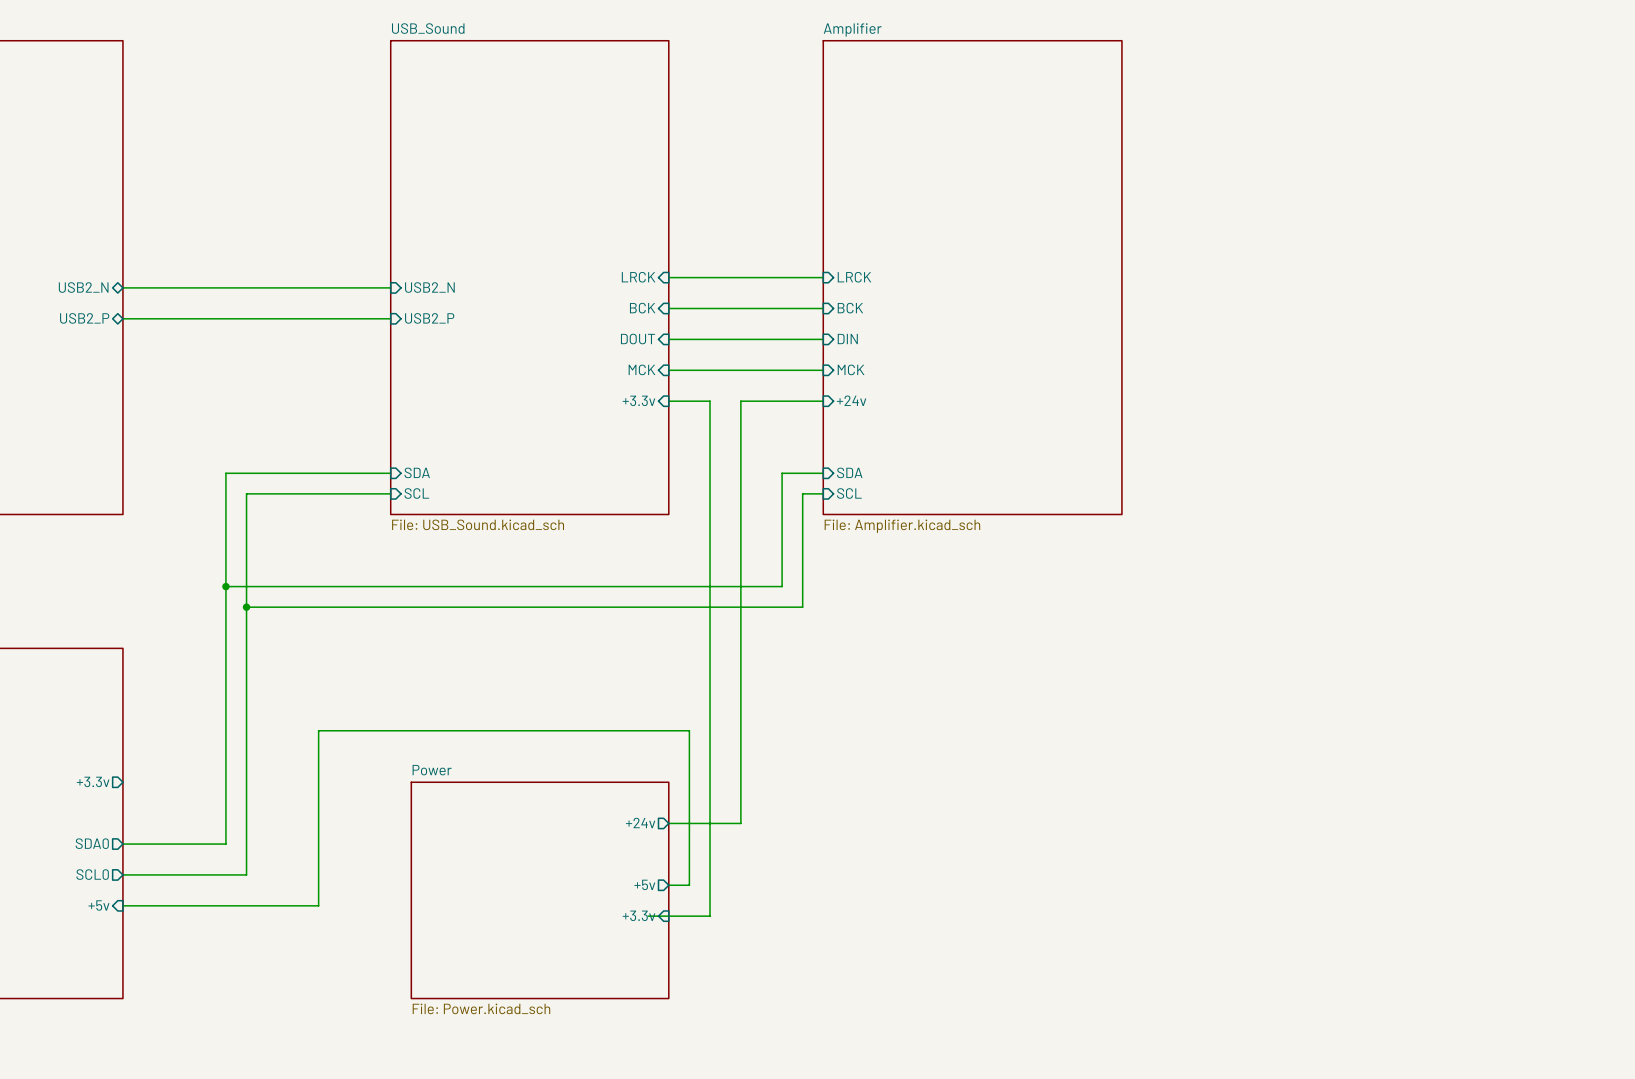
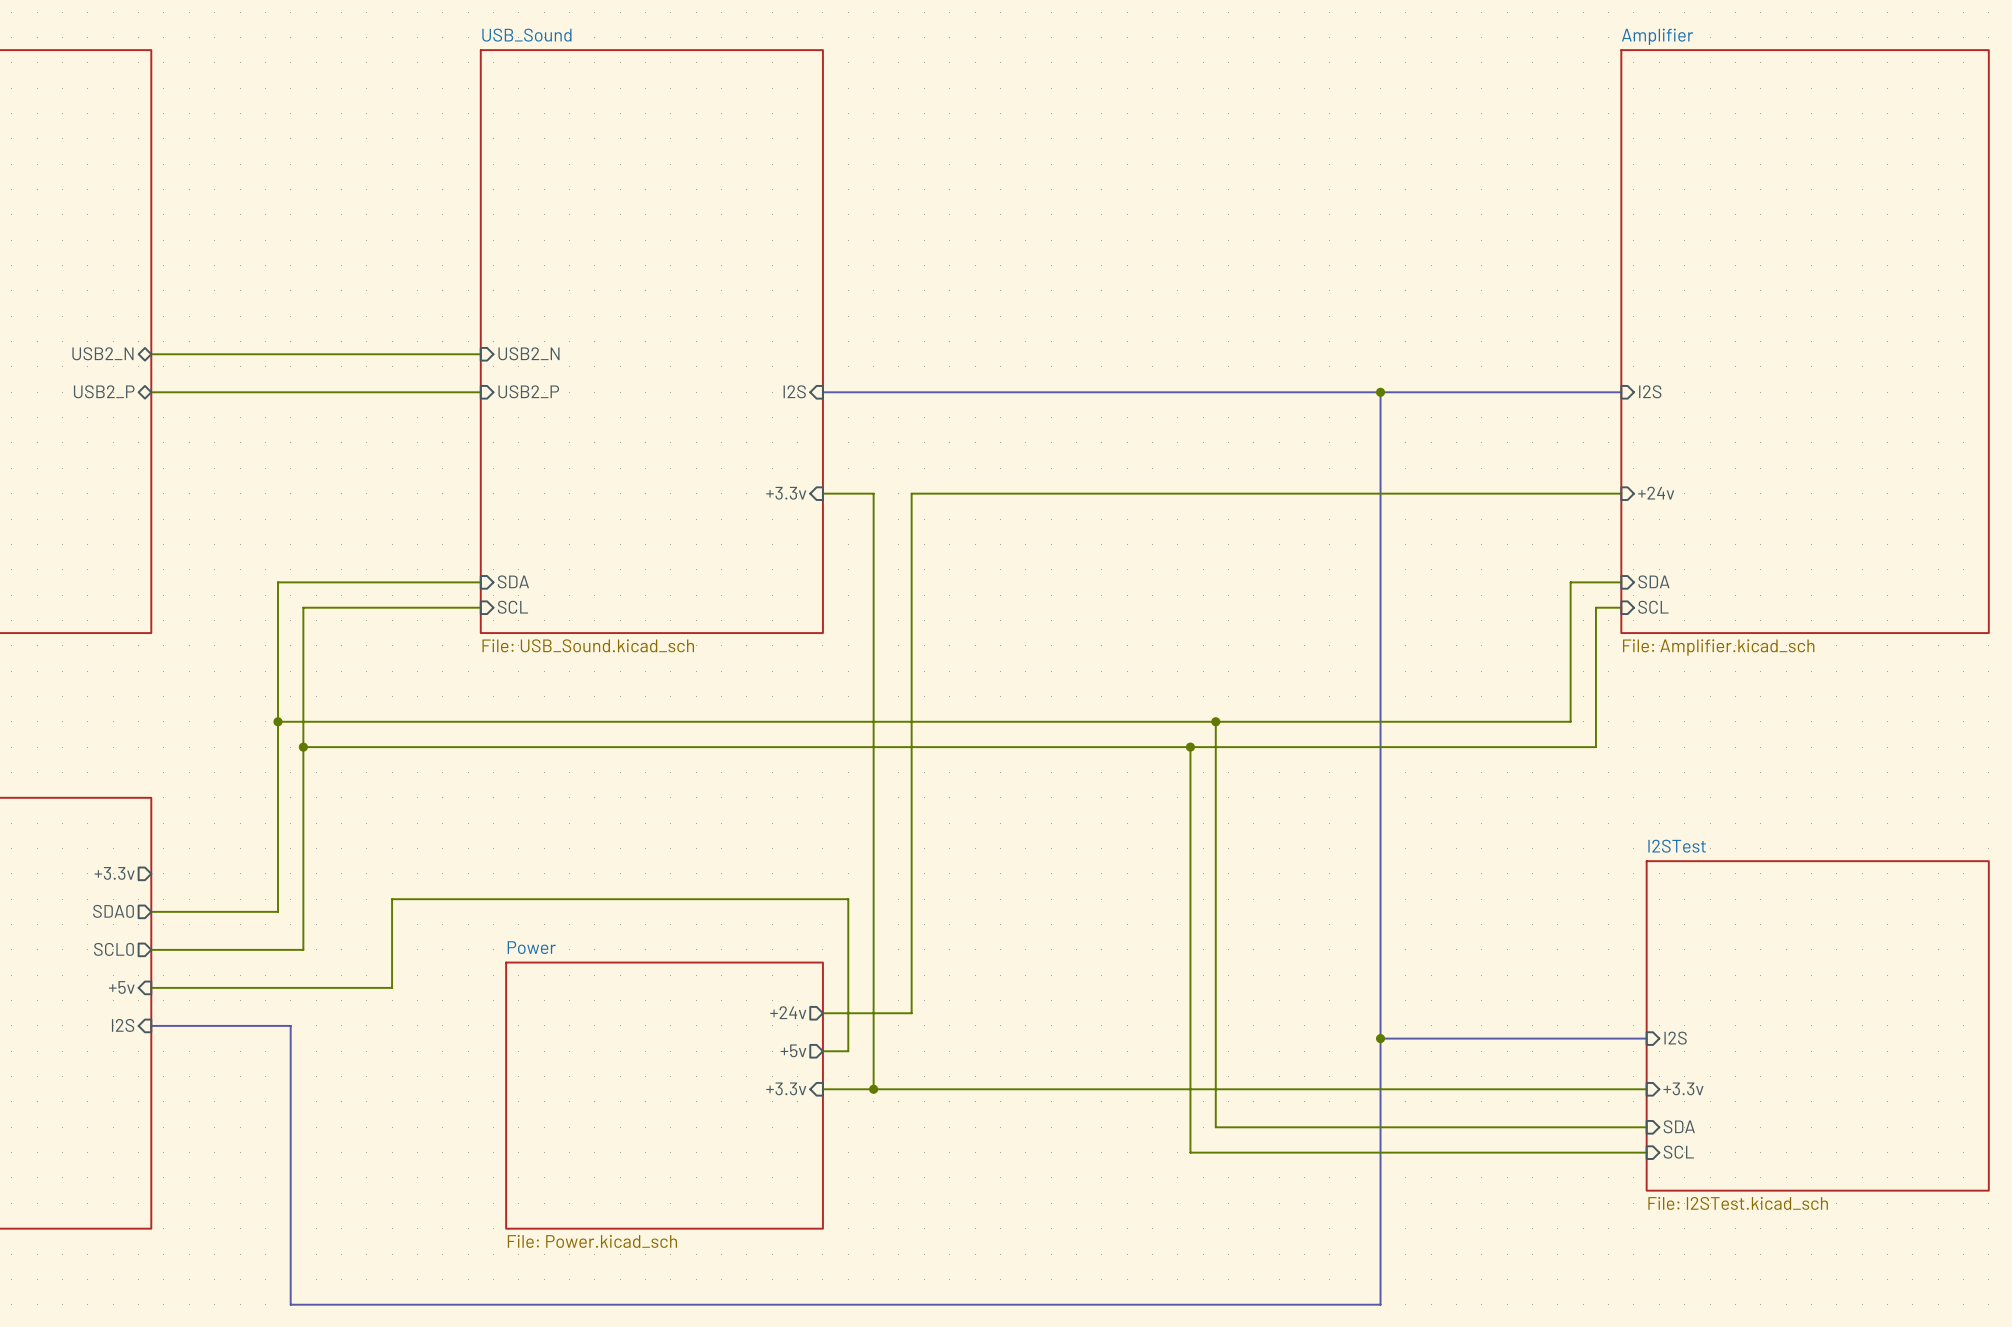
sheet pin: LRCK (638, 277) -> none
wire: (668, 277) (823, 277) -> none
sheet pin: LRCK (854, 277) -> none
sheet Amplifier: File: Amplifier.kicad_sch (972, 277) -> none
sheet Amplifier: none -> File: Amplifier.kicad_sch (1805, 341)
sheet pin: BCK (642, 308) -> none
wire: (668, 308) (823, 308) -> none
sheet pin: BCK (850, 308) -> none
sheet pin: none -> I2S (794, 391)
bus: none -> (822, 392) (1621, 392)
bus: none -> (1380, 392) (1380, 1304) (290, 1304) (290, 1025) (151, 1025)
junction: none -> (1380, 392)
sheet pin: none -> I2S (1650, 391)
sheet pin: DOUT (638, 339) -> none
wire: (668, 339) (823, 339) -> none
sheet pin: DIN (847, 339) -> none
sheet pin: MCK (641, 369) -> none
sheet pin: MCK (851, 369) -> none
wire: (668, 370) (823, 370) -> none
sheet pin: +24v (851, 400) -> none
sheet pin: none -> +24v (1656, 493)
wire: none -> (1013, 493) (1621, 493)
sheet pin: SDA (849, 472) -> none
sheet pin: none -> SDA (1653, 581)
wire: (823, 473) (782, 473) (782, 586) -> (1621, 582) (1570, 582) (1570, 721) (962, 721)
wire: (823, 493) (802, 493) (802, 607) -> (1621, 607) (1595, 607) (1595, 747) (987, 747)
sheet pin: SCL (849, 493) -> none
sheet pin: none -> SCL (1653, 607)
wire: none -> (1215, 721) (1215, 1127) (1646, 1127)
junction: none -> (1215, 721)
wire: none -> (1190, 747) (1190, 1152) (1646, 1152)
junction: none -> (1190, 747)
wire: (225, 741) (225, 844) (122, 844) -> (278, 911) (151, 911)
wire: (246, 771) (246, 874) (122, 874) -> (303, 949) (151, 949)
sheet pin position: +3.3v (93, 781) -> +3.3v (114, 873)
wire: (318, 802) (318, 905) (122, 905) -> (392, 987) (151, 987)
sheet pin: none -> I2S (123, 1025)
sheet I2STest: none -> File: I2STest.kicad_sch (1817, 1025)
sheet pin position: SDA0 (92, 843) -> SDA0 (113, 911)
sheet pin: none -> I2S (1675, 1038)
bus: none -> (1380, 1038) (1646, 1038)
junction: none -> (1380, 1038)
sheet pin: none -> +5v (793, 1050)
wire: (689, 854) (689, 885) -> (848, 1051) (822, 1051)
sheet pin position: SCL0 (92, 874) -> SCL0 (113, 949)
sheet pin shape: output (644, 884) -> input (786, 1088)
sheet pin: +5v (644, 884) -> +3.3v (786, 1088)
sheet pin: none -> +3.3v (1683, 1088)
wire: none -> (848, 1089) (1646, 1089)
wire: (709, 885) (709, 916) (648, 916) -> none
junction: none -> (873, 1089)
sheet pin position: +5v (98, 905) -> +5v (121, 987)
sheet pin: +3.3v (638, 915) -> none
sheet pin: none -> SDA (1679, 1126)
sheet pin: none -> SCL (1678, 1152)

